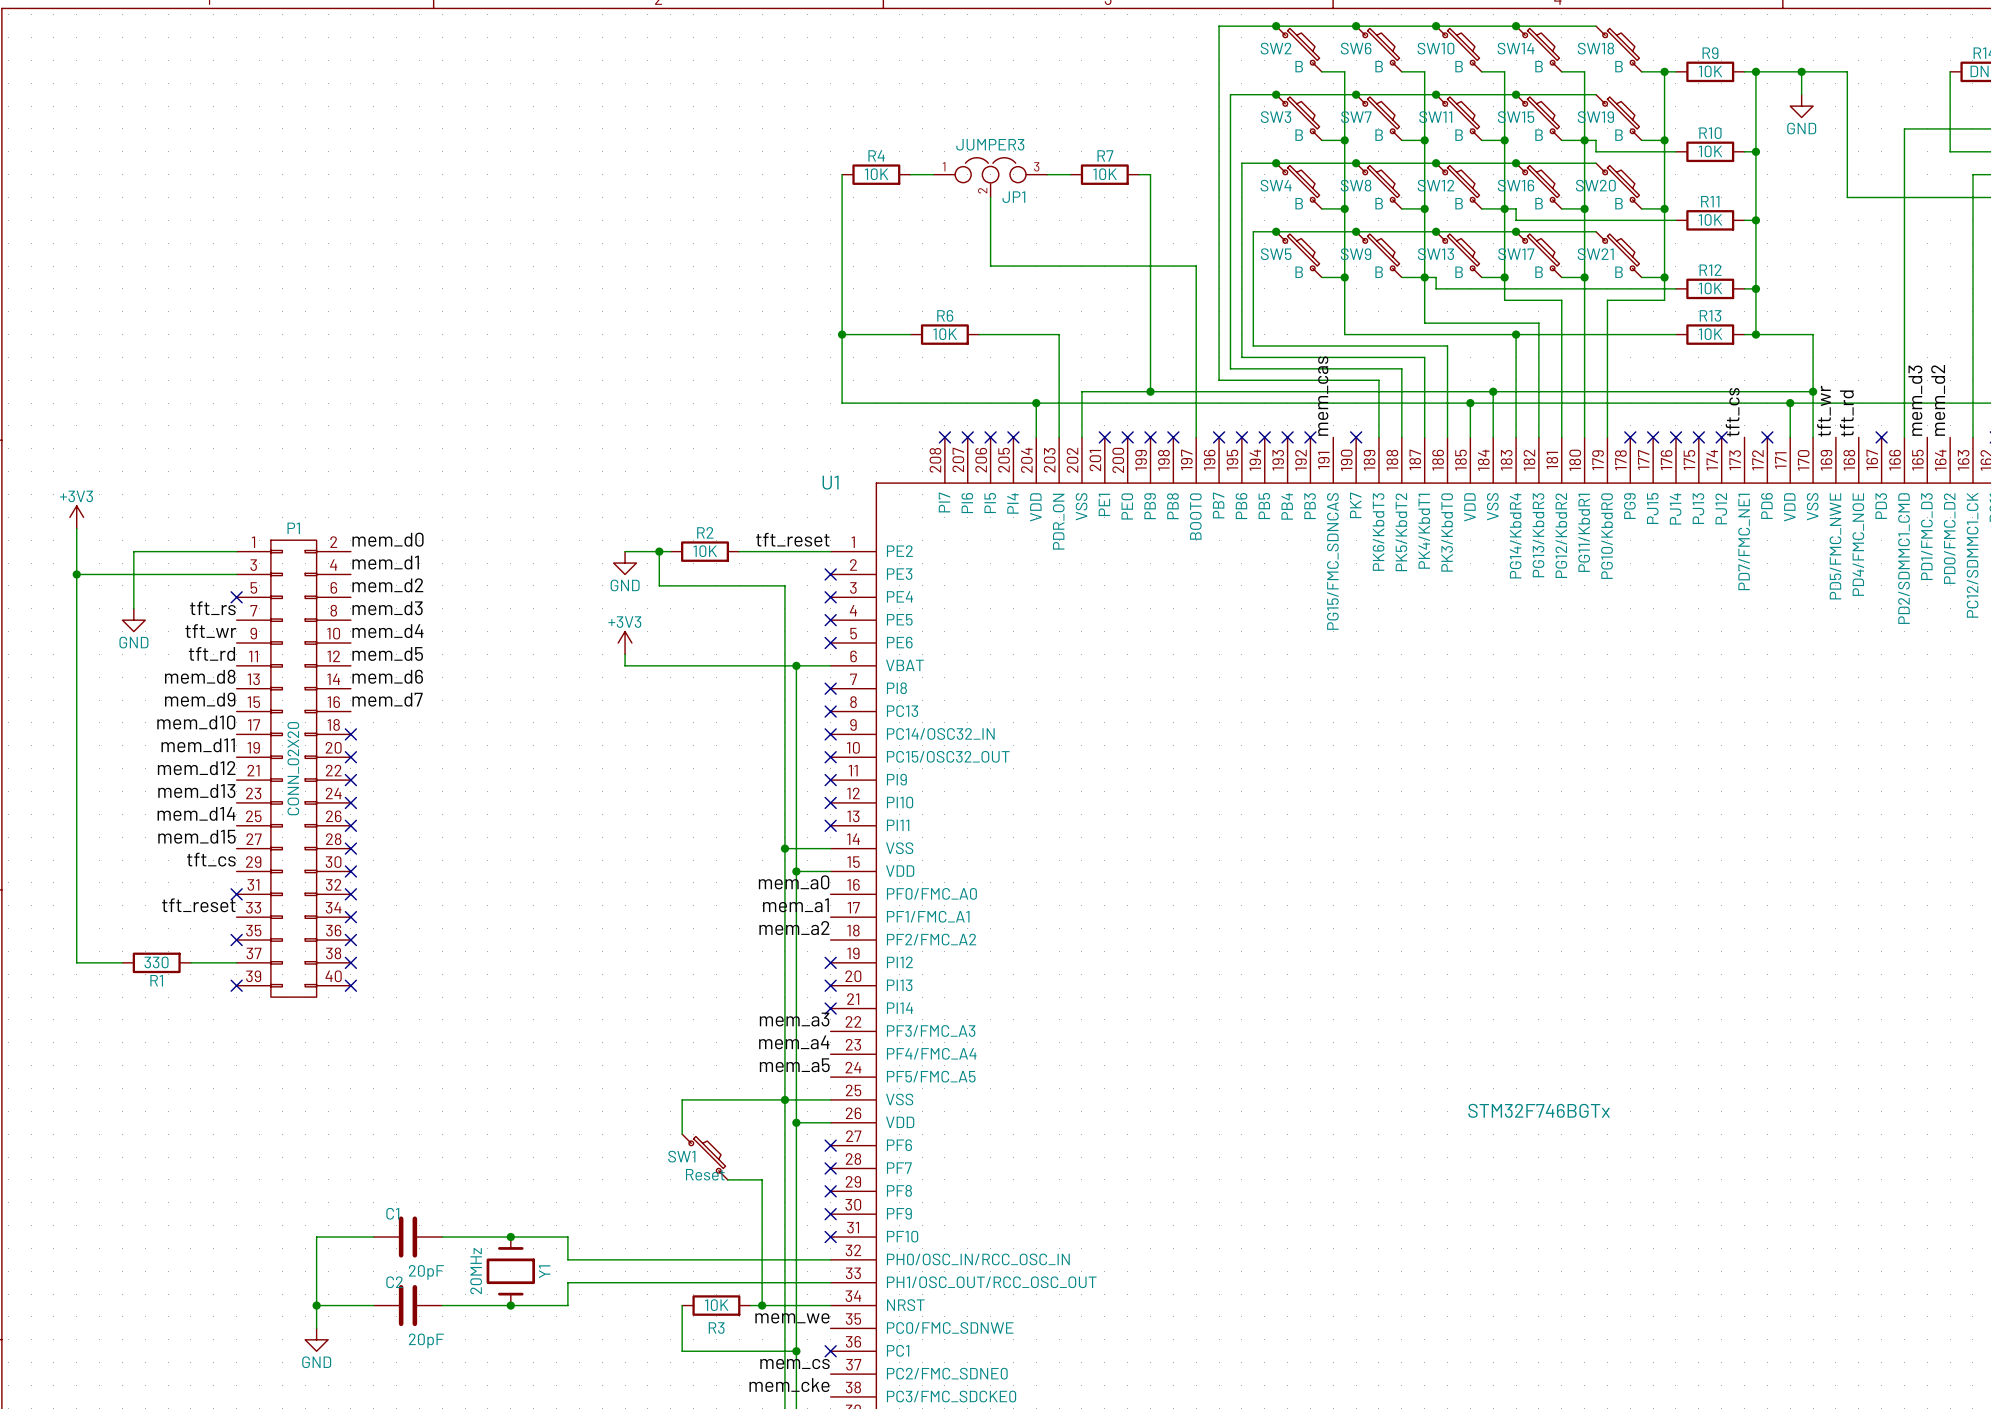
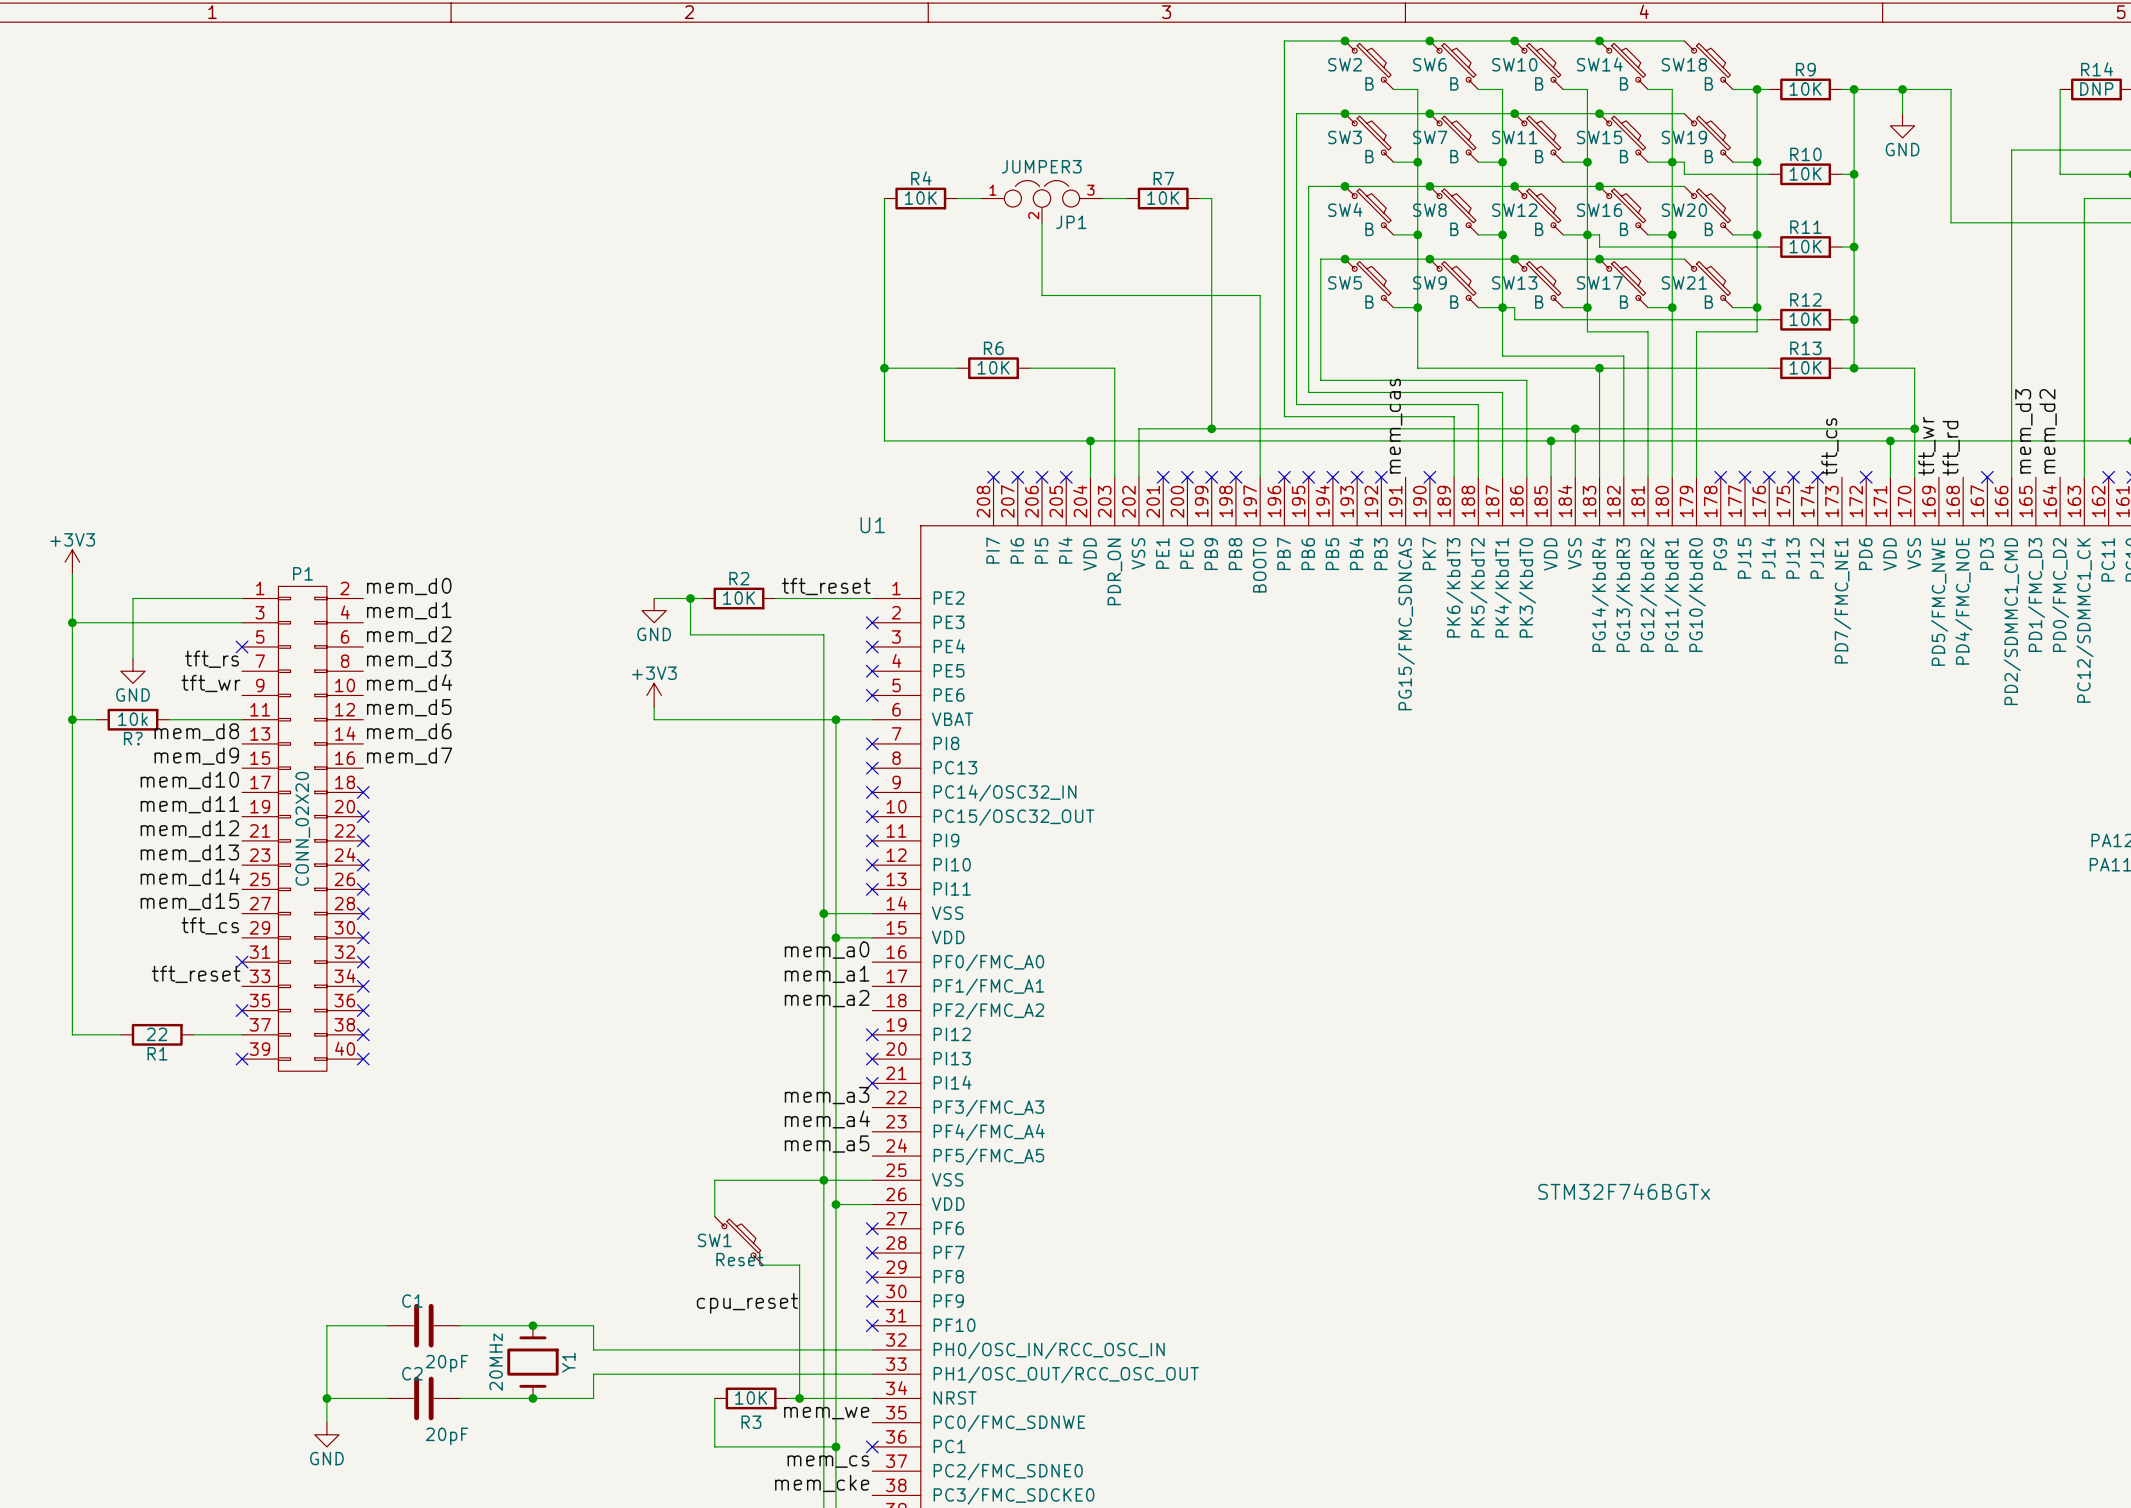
label: tft_rd (211, 653) -> none
wire: none -> (72, 719) (96, 719)
junction: none -> (72, 719)
R?: none -> 10k (132, 719)
wire: none -> (169, 719) (242, 719)
R1 value: 330 (156, 962) -> 22 (156, 1034)
label: none -> cpu_reset (747, 1303)

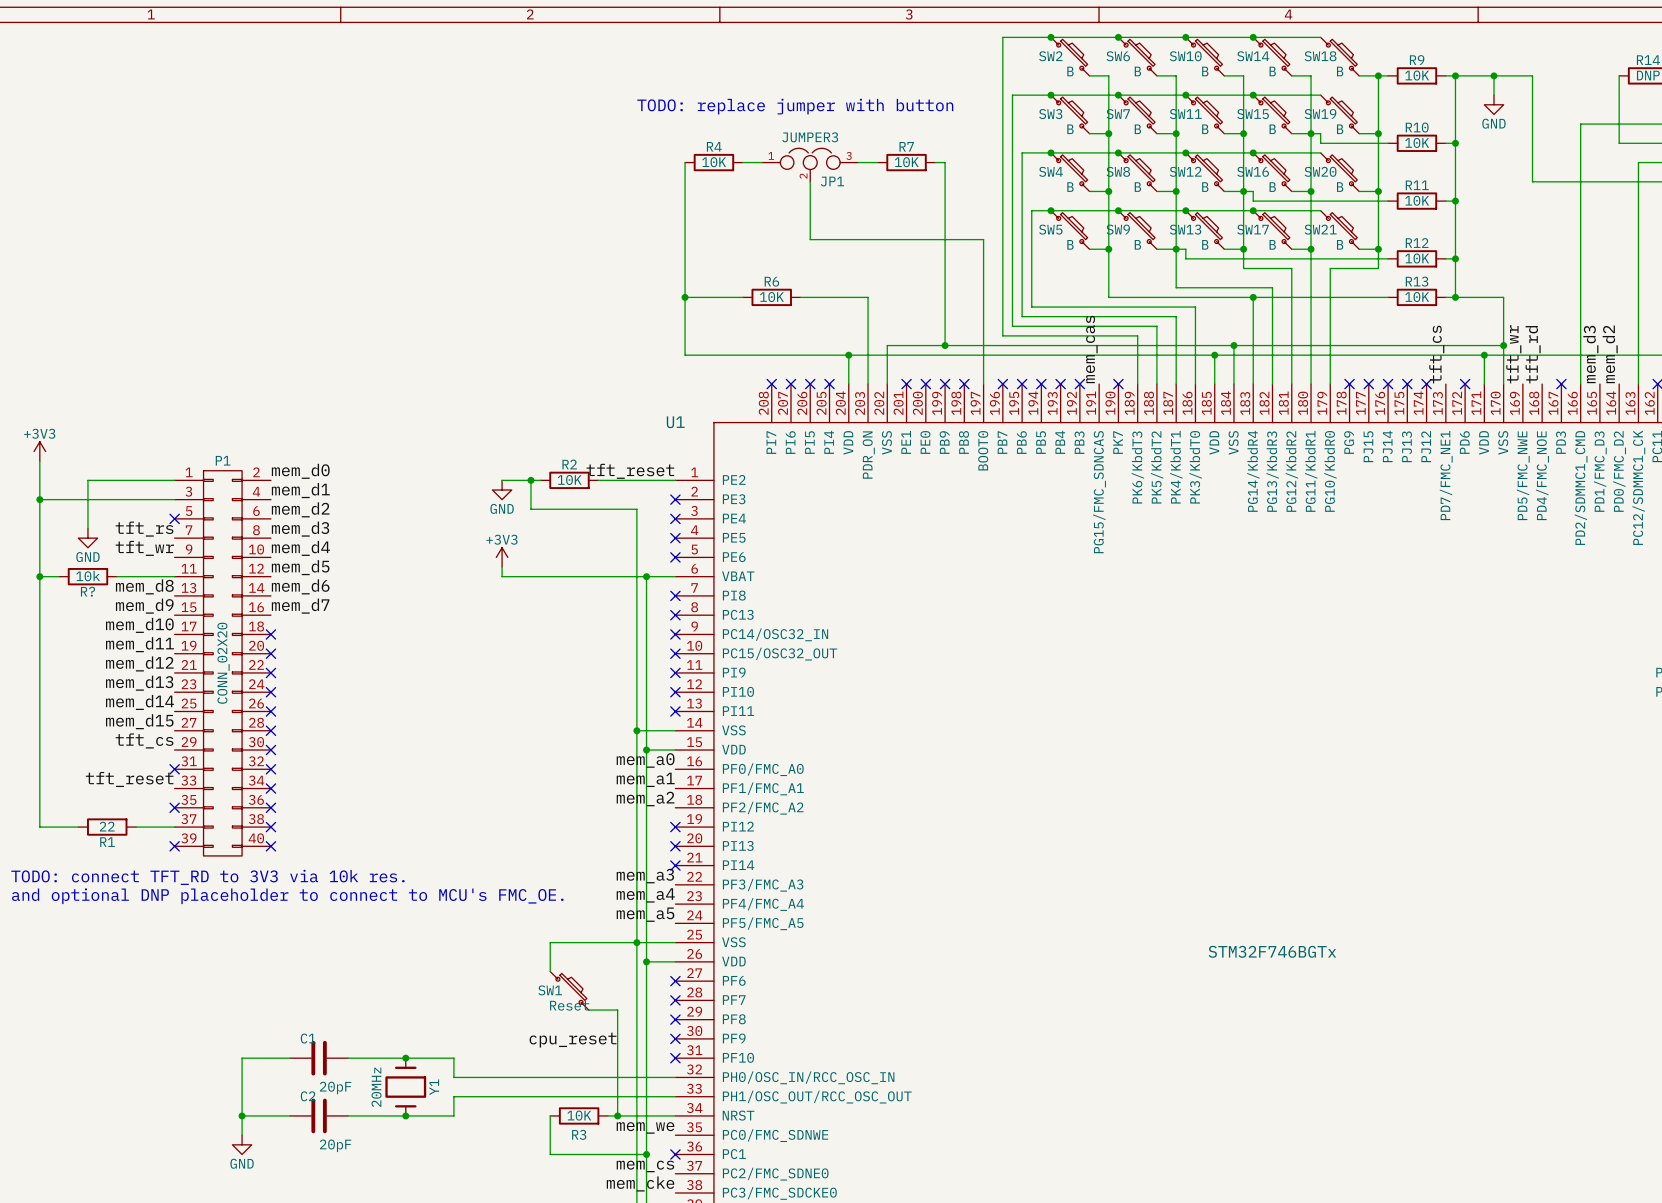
text: none -> TODO: replace jumper with button (795, 106)
text: none -> TODO: connect TFT_RD to 3V3 via 10k res. (207, 877)
text: none -> and optional DNP placeholder to connect to MCU's FMC_OE. (287, 896)

